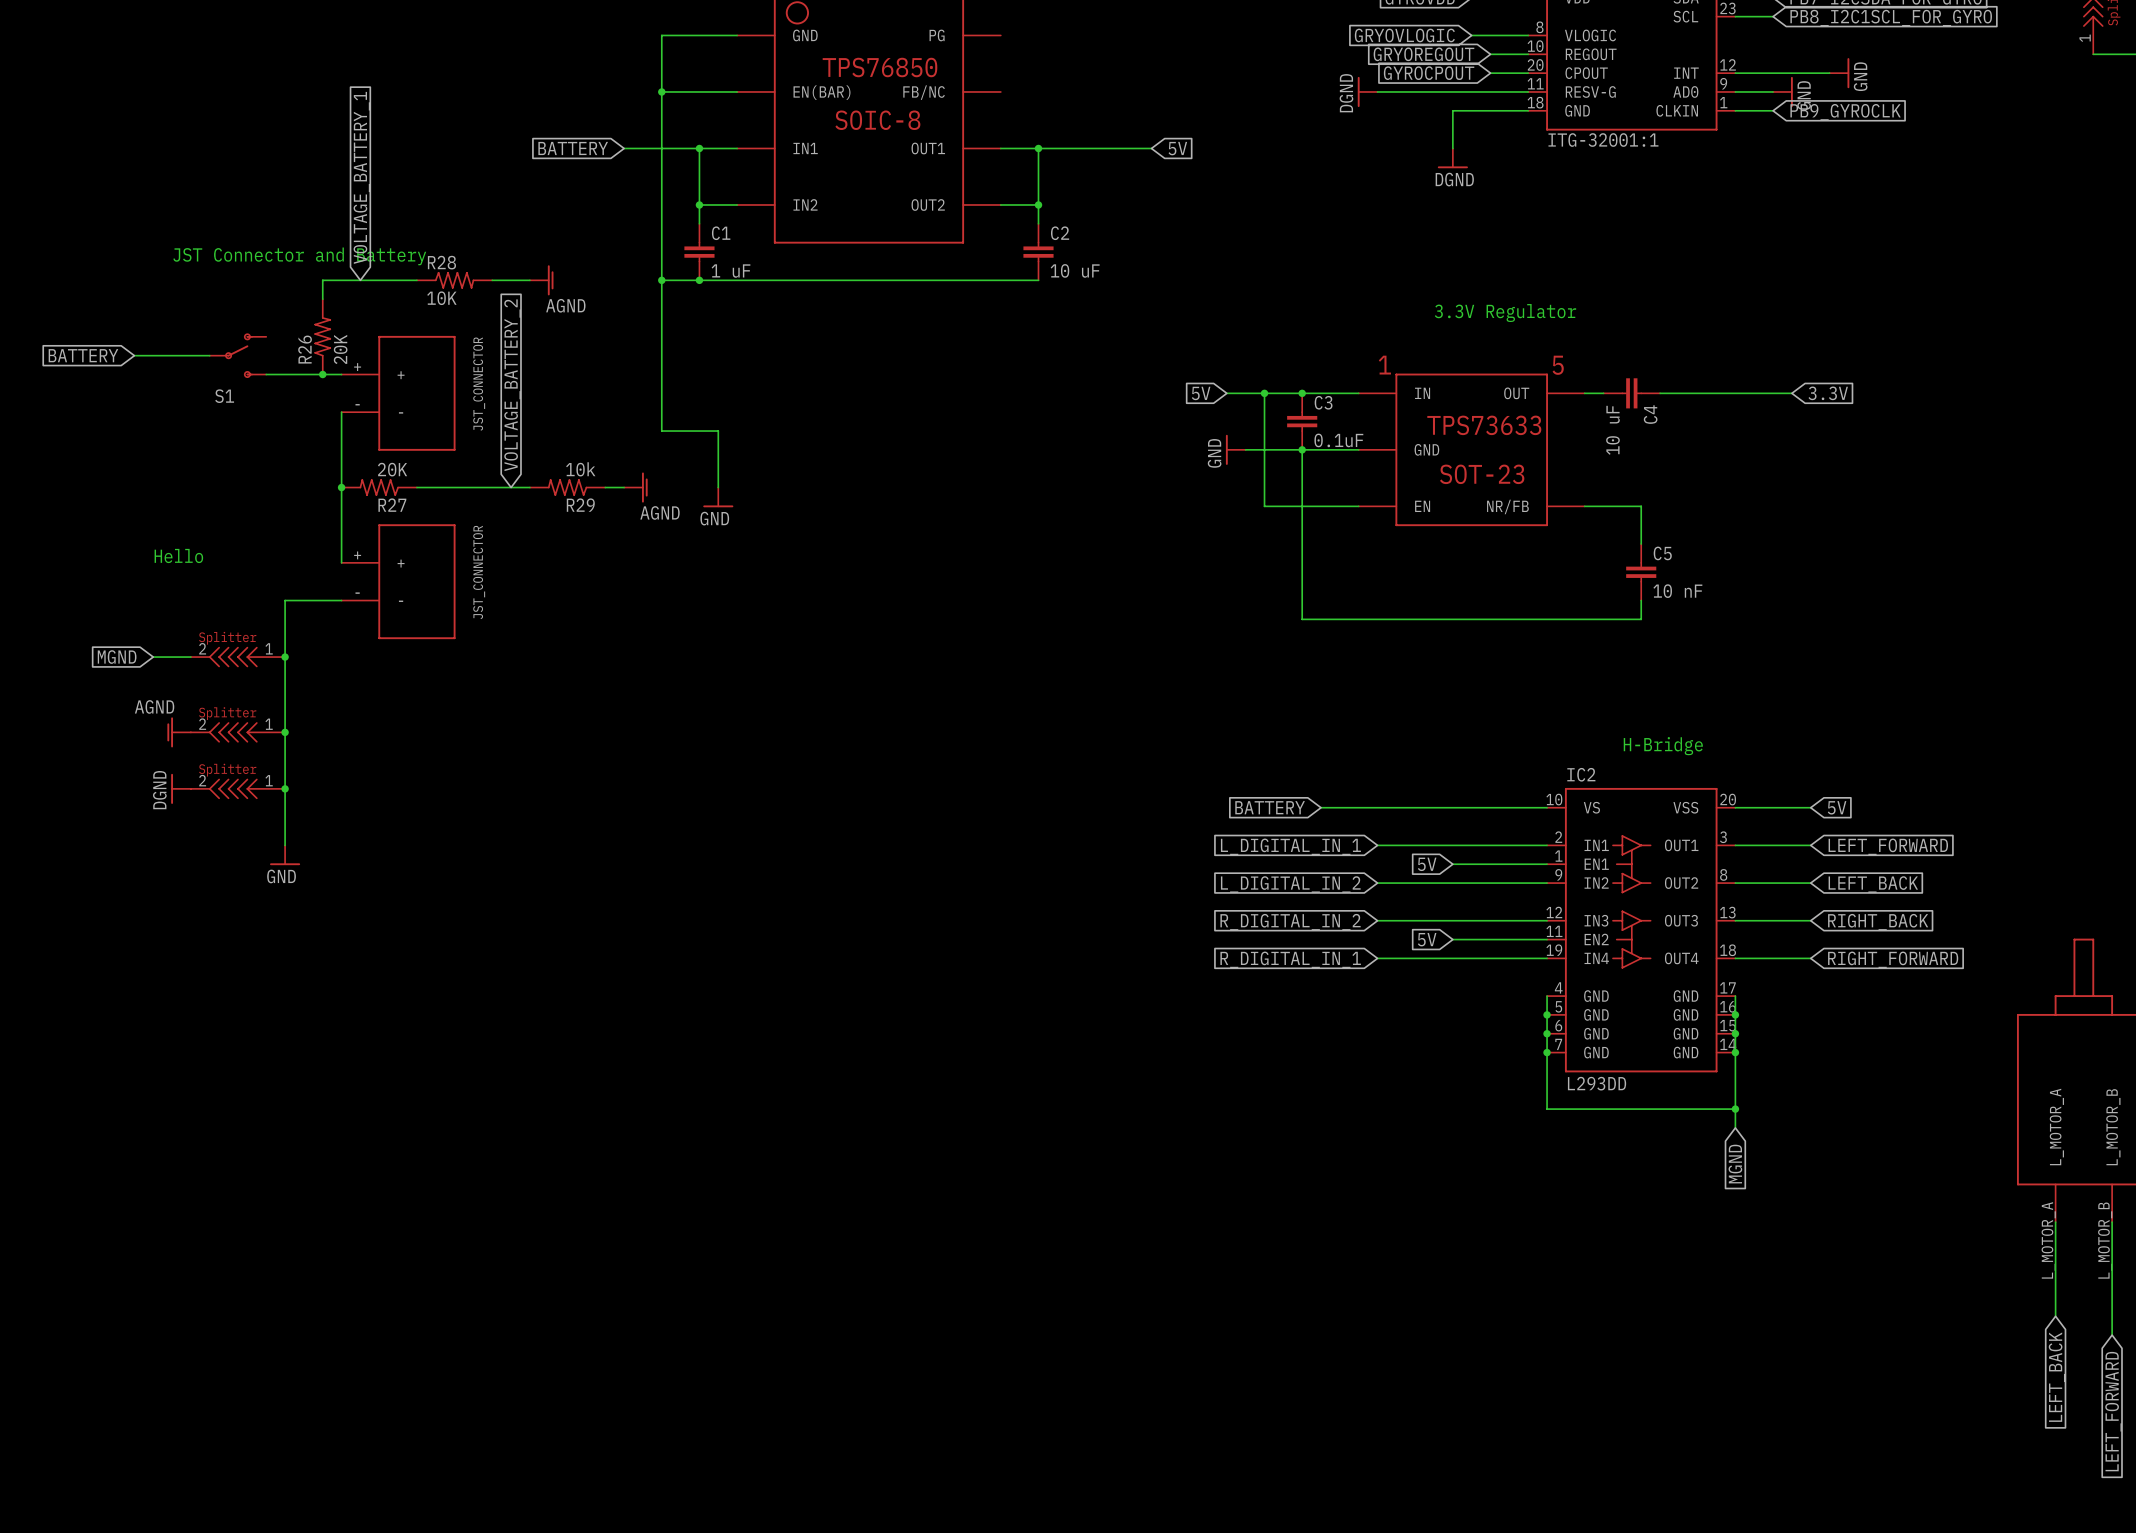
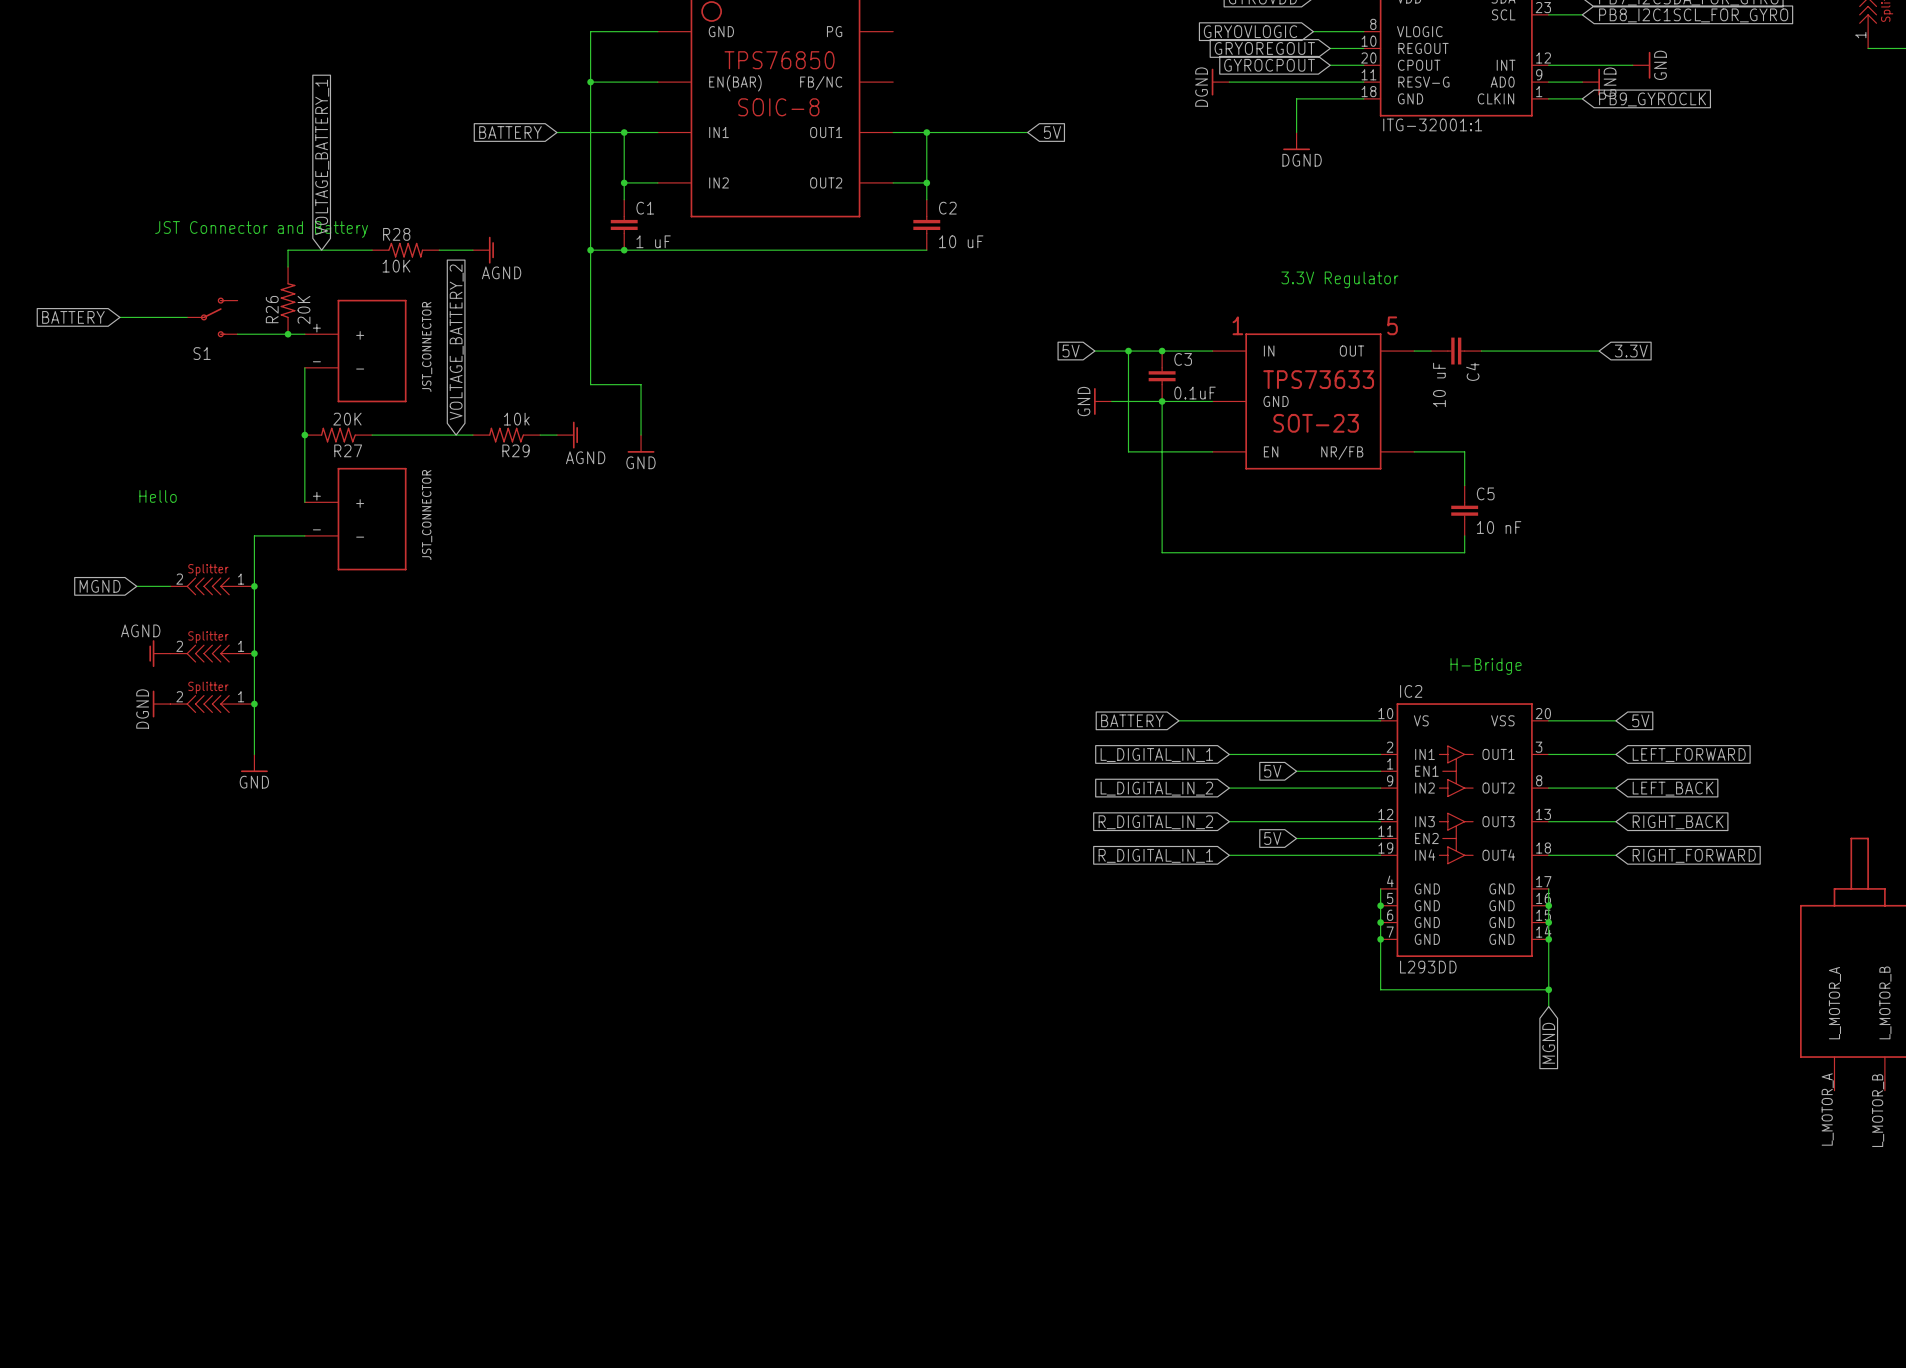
wire: (2055, 1222) (2055, 1316) -> none
wire: (2112, 1222) (2112, 1335) -> none
global label: LEFT_BACK (2057, 1377) -> none
global label: LEFT_FORWARD (2113, 1411) -> none

